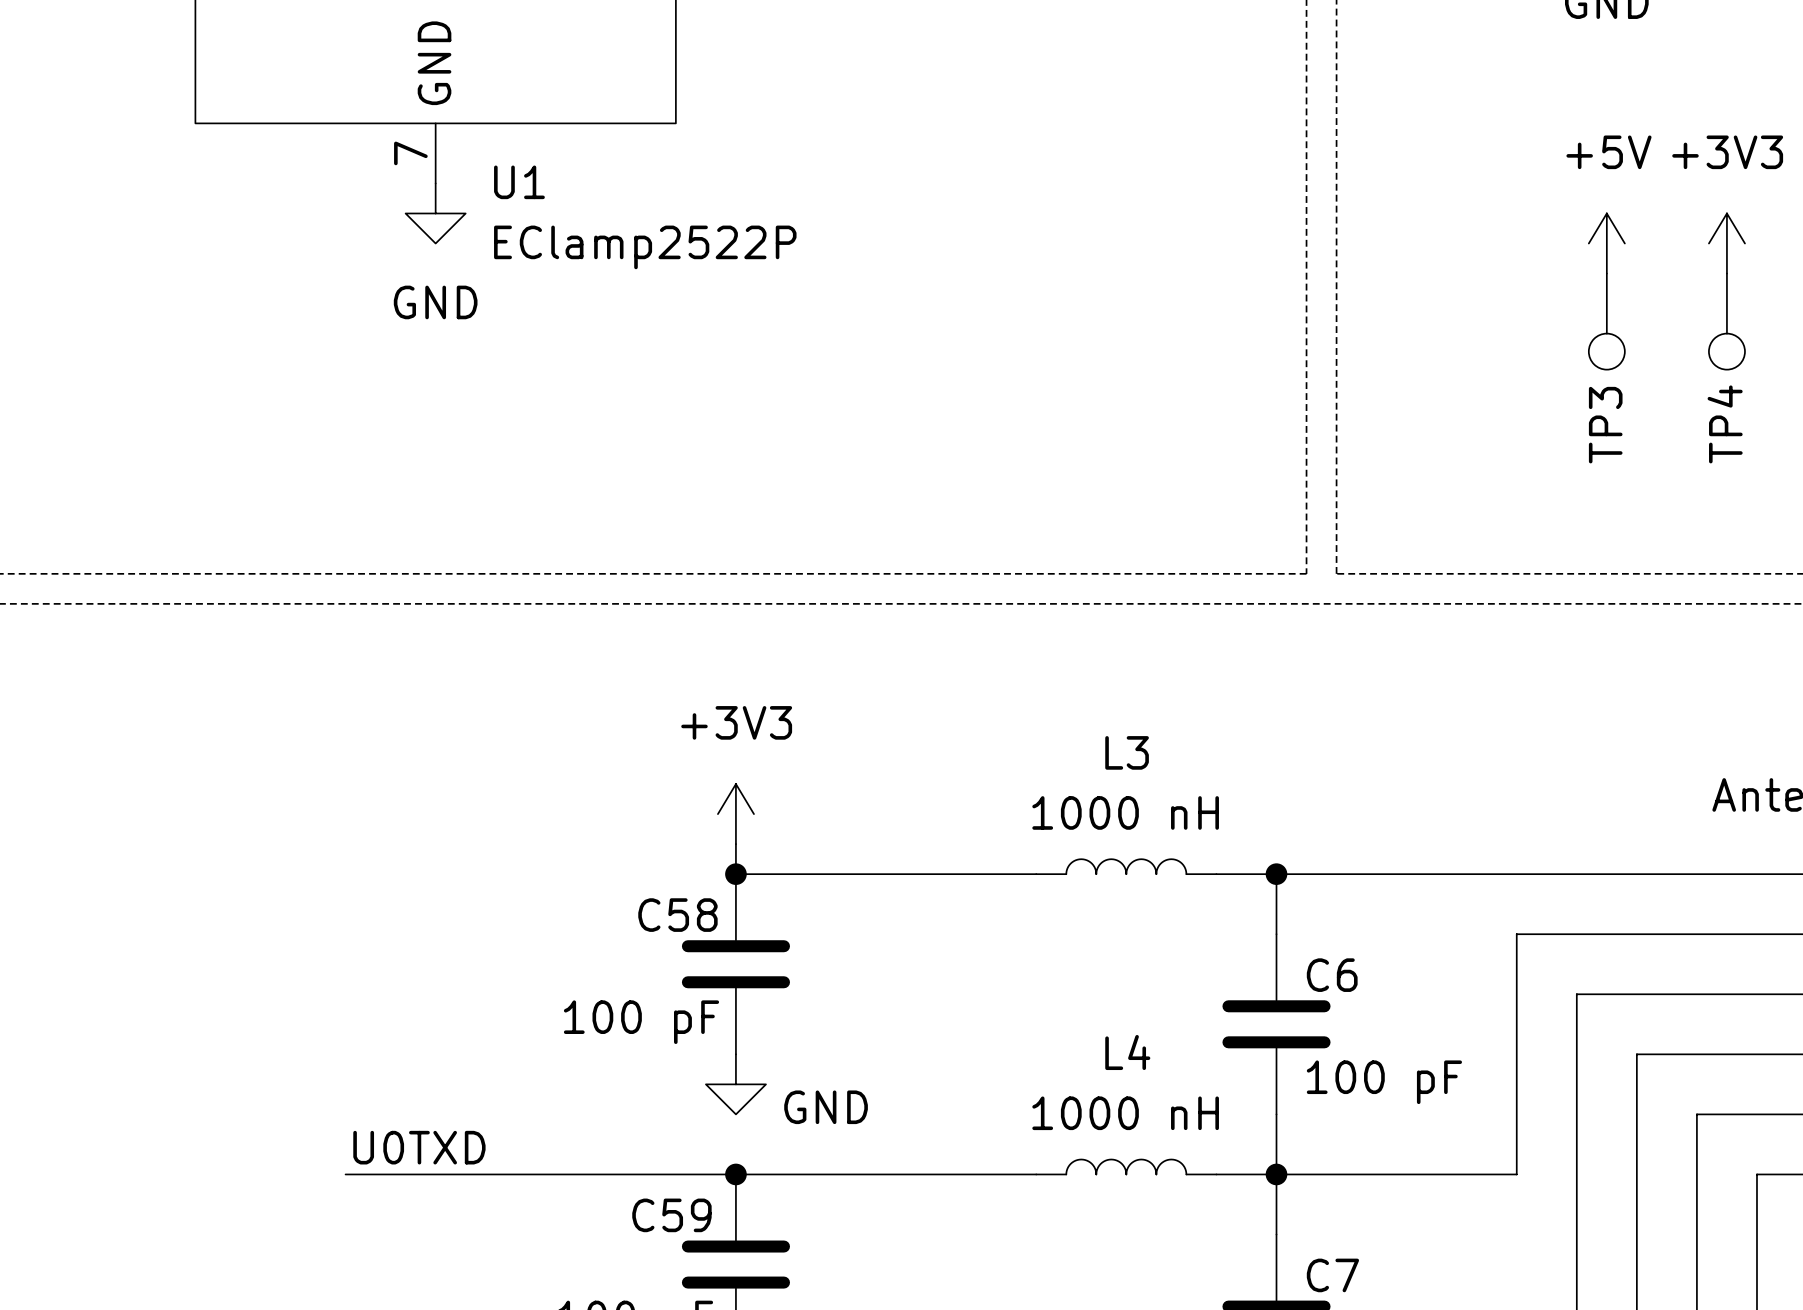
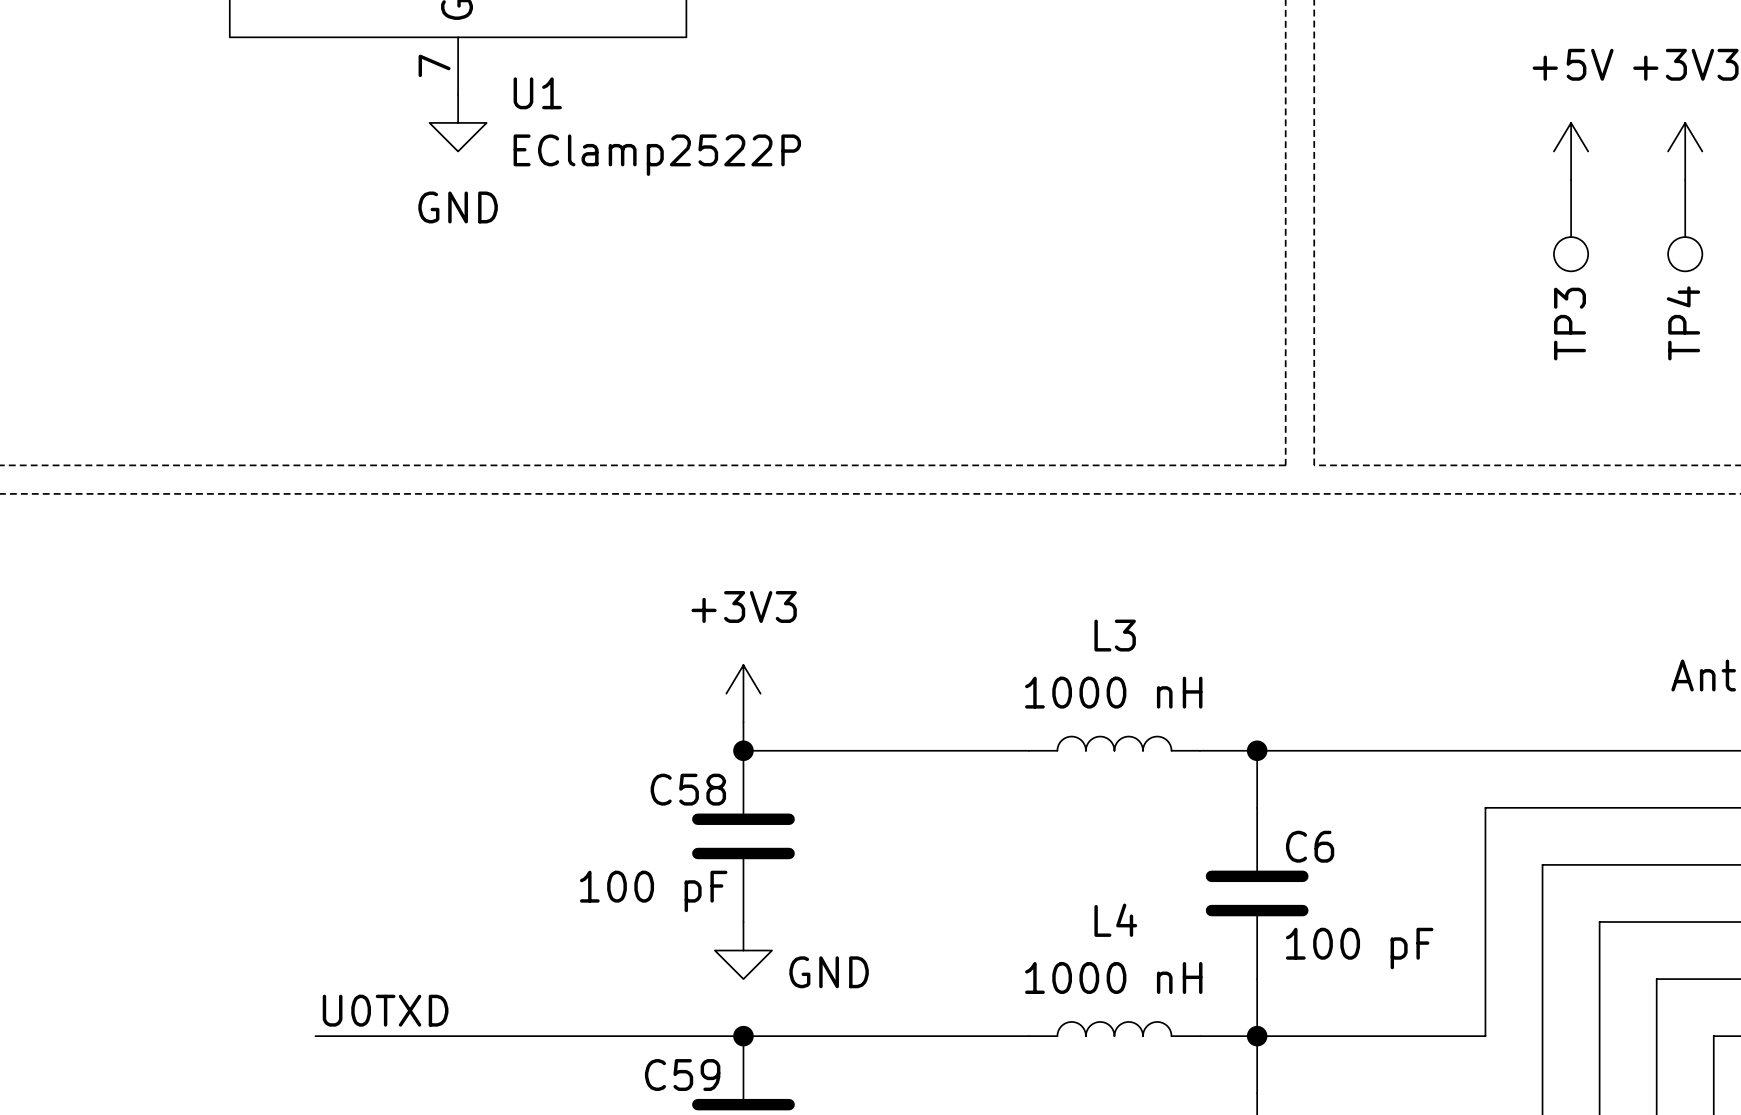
label position: U0TXD (419, 1147) -> U0TXD (385, 1010)
wire: none -> (315, 1036) (372, 1036)

